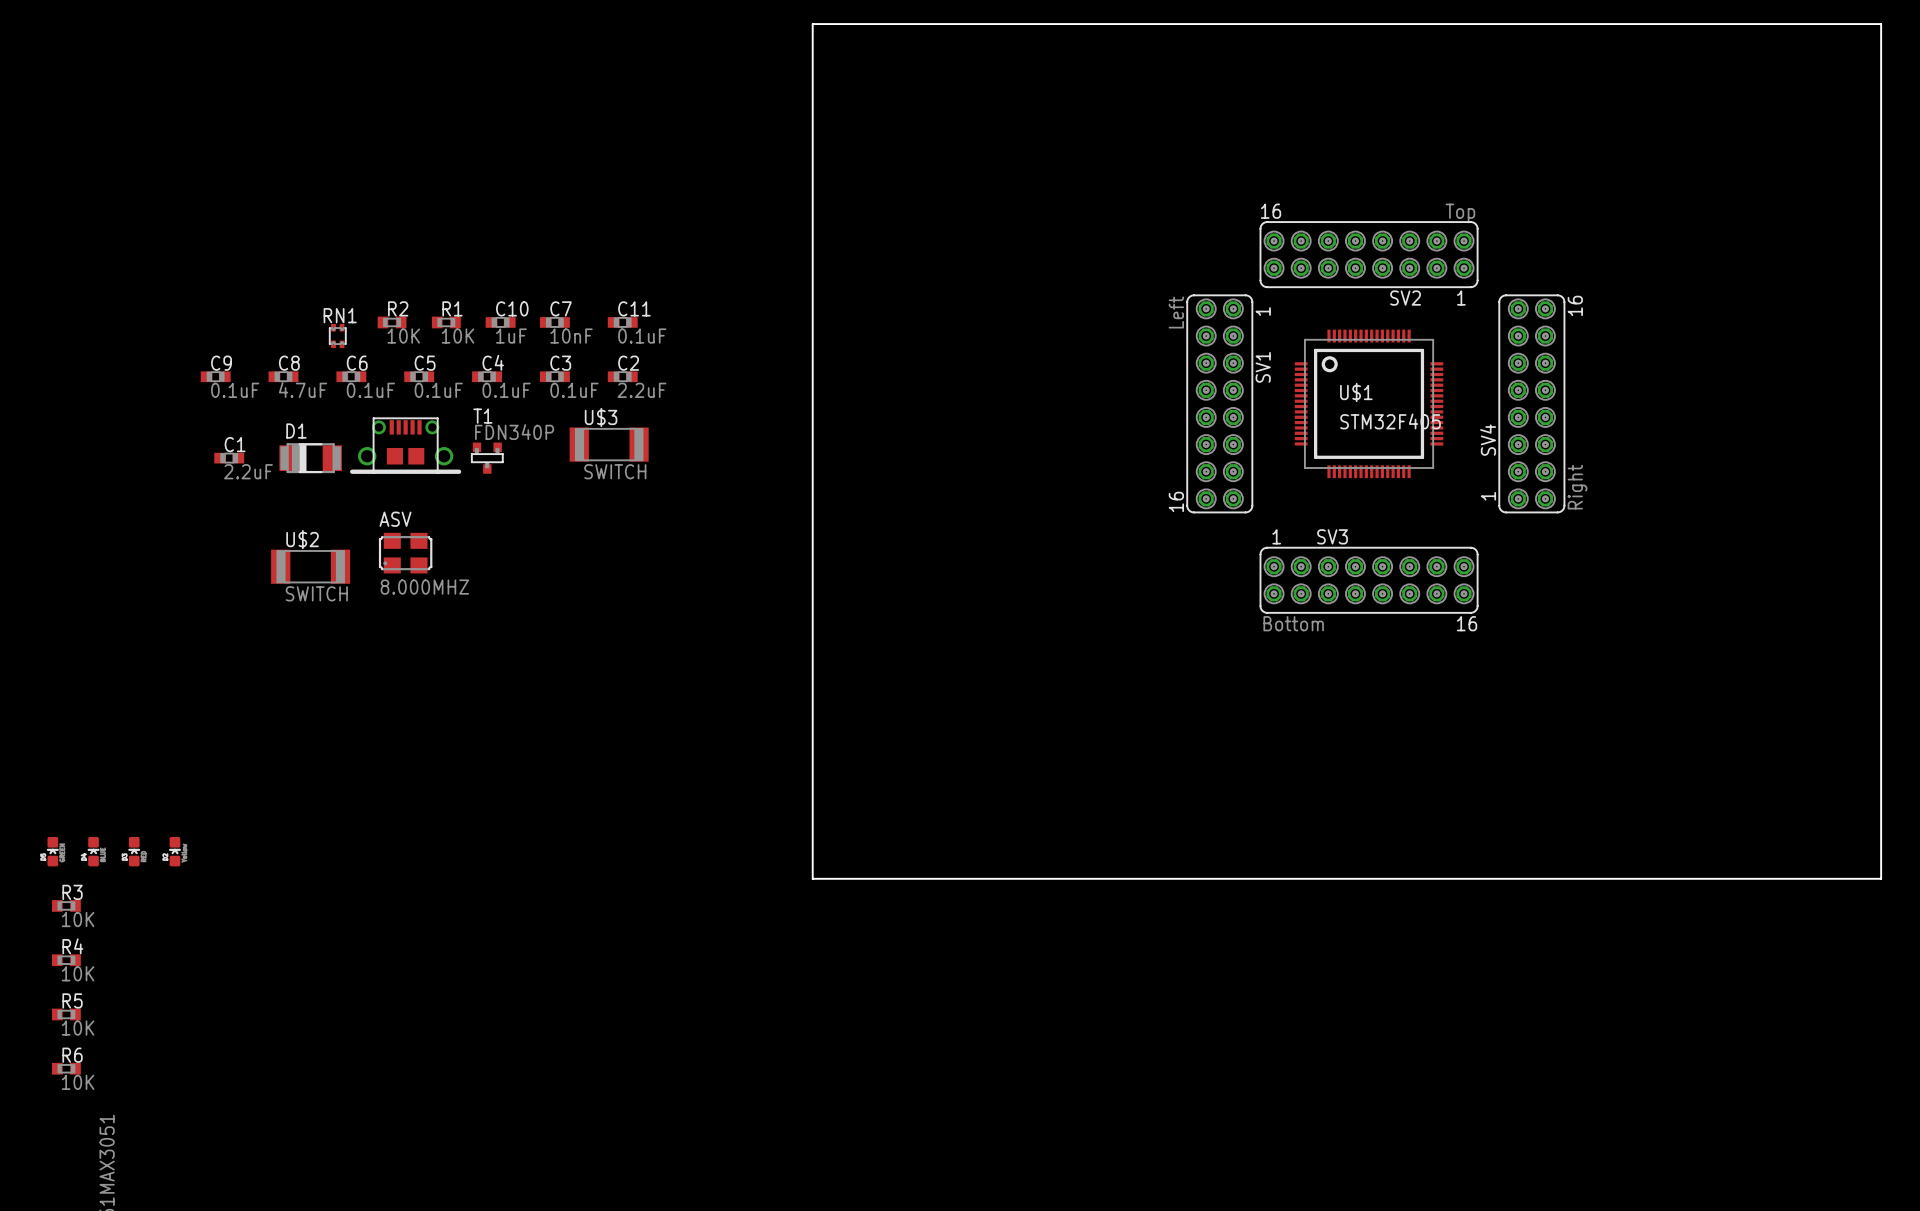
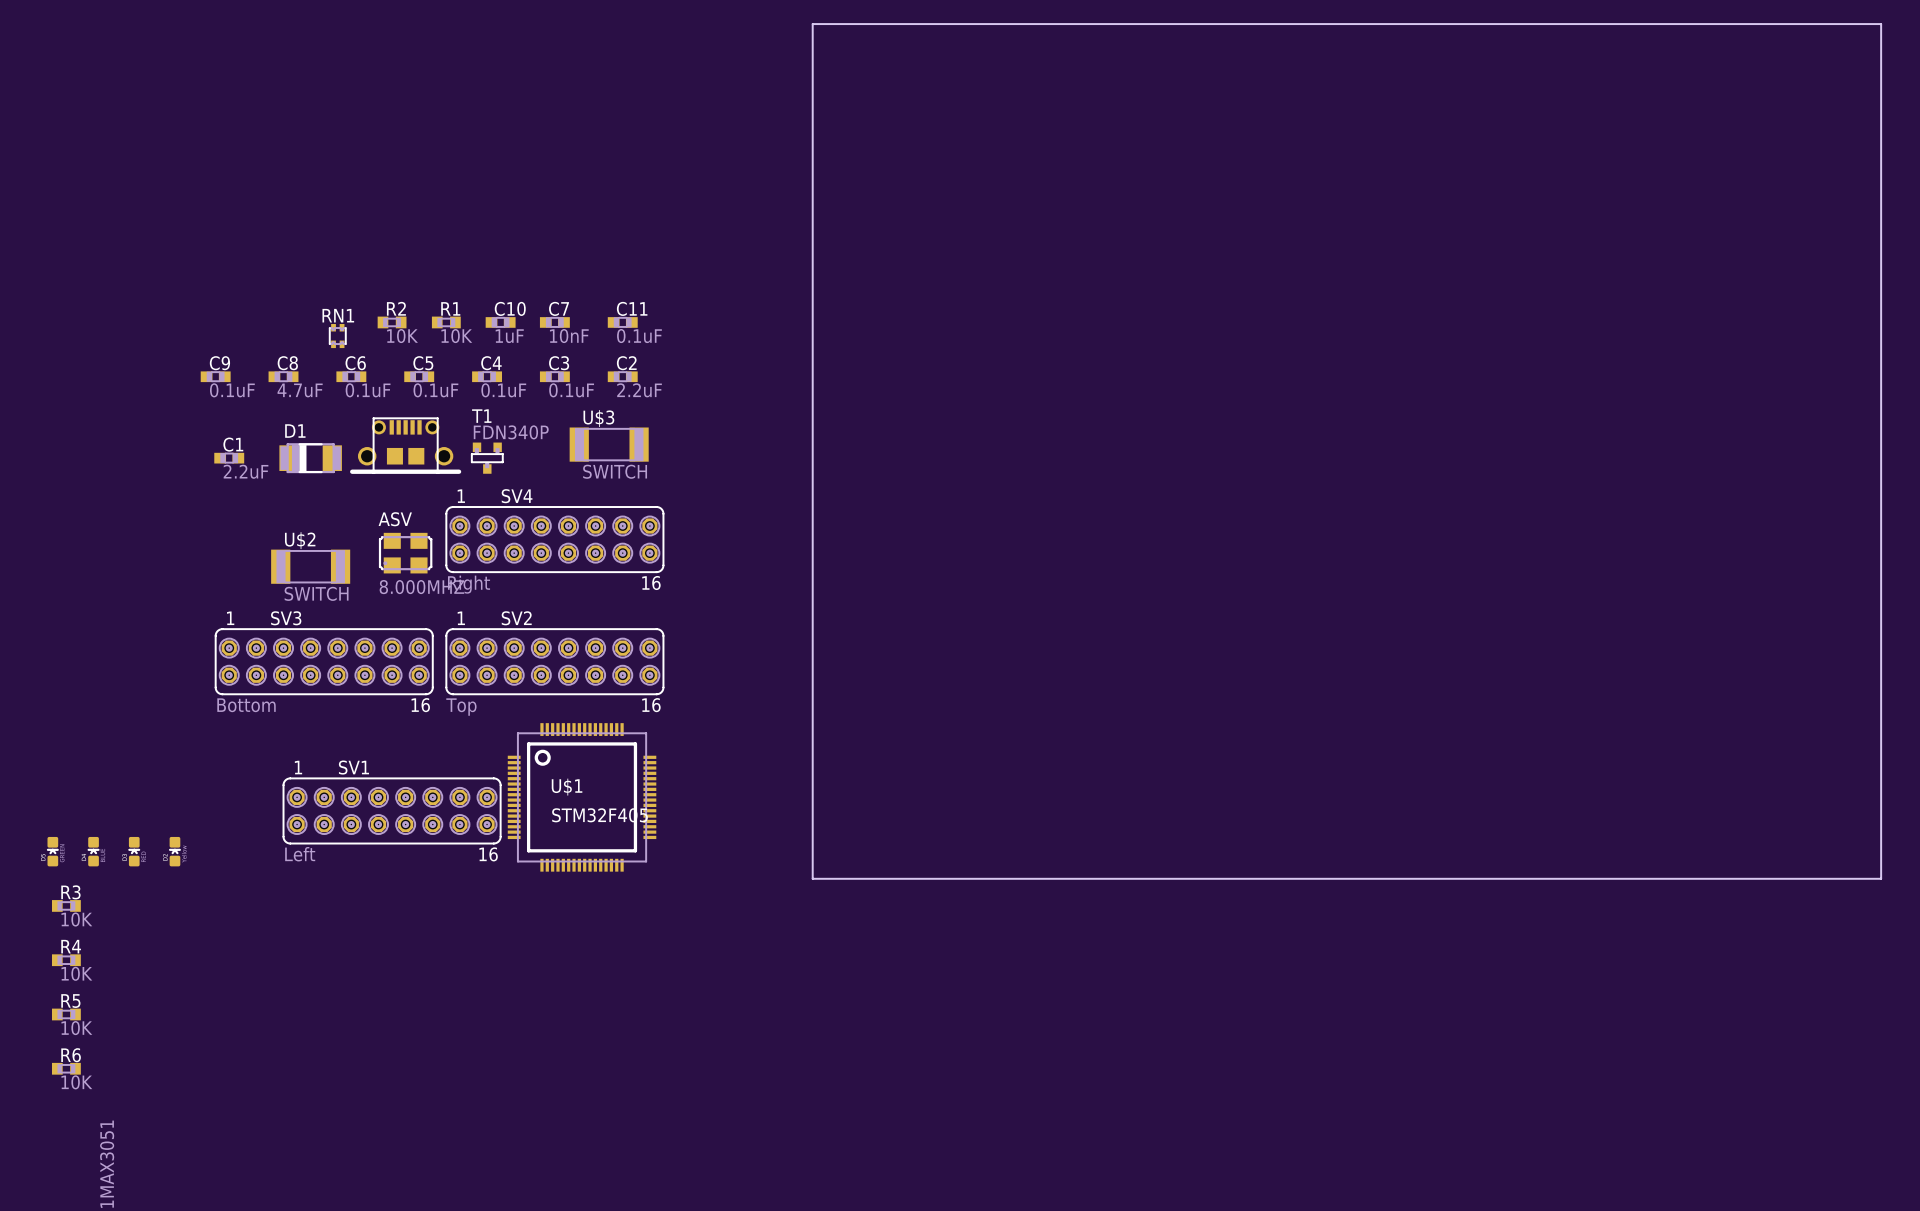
SV2 text position: 16 (1271, 211) -> 16 (651, 705)
SV2 value position: Top (1460, 213) -> Top (461, 707)
SV2 position: (1369, 254) -> (554, 661)
SV1 footprint: [1186, 294, 1254, 514] -> [282, 777, 502, 845]
SV2 name position: SV2 (1405, 298) -> SV2 (516, 618)
SV2 text position: 1 (1461, 298) -> 1 (461, 618)
SV1 value position: Left (1176, 312) -> Left (300, 854)
SV1 name position: SV1 (1263, 367) -> SV1 (353, 767)
U$1 position: (1369, 403) -> (582, 797)
SV4 rotation: 0° (1531, 403) -> 90° clockwise (554, 539)
SV4 position: (1531, 403) -> (554, 539)
SV3 position: (1369, 580) -> (324, 661)

